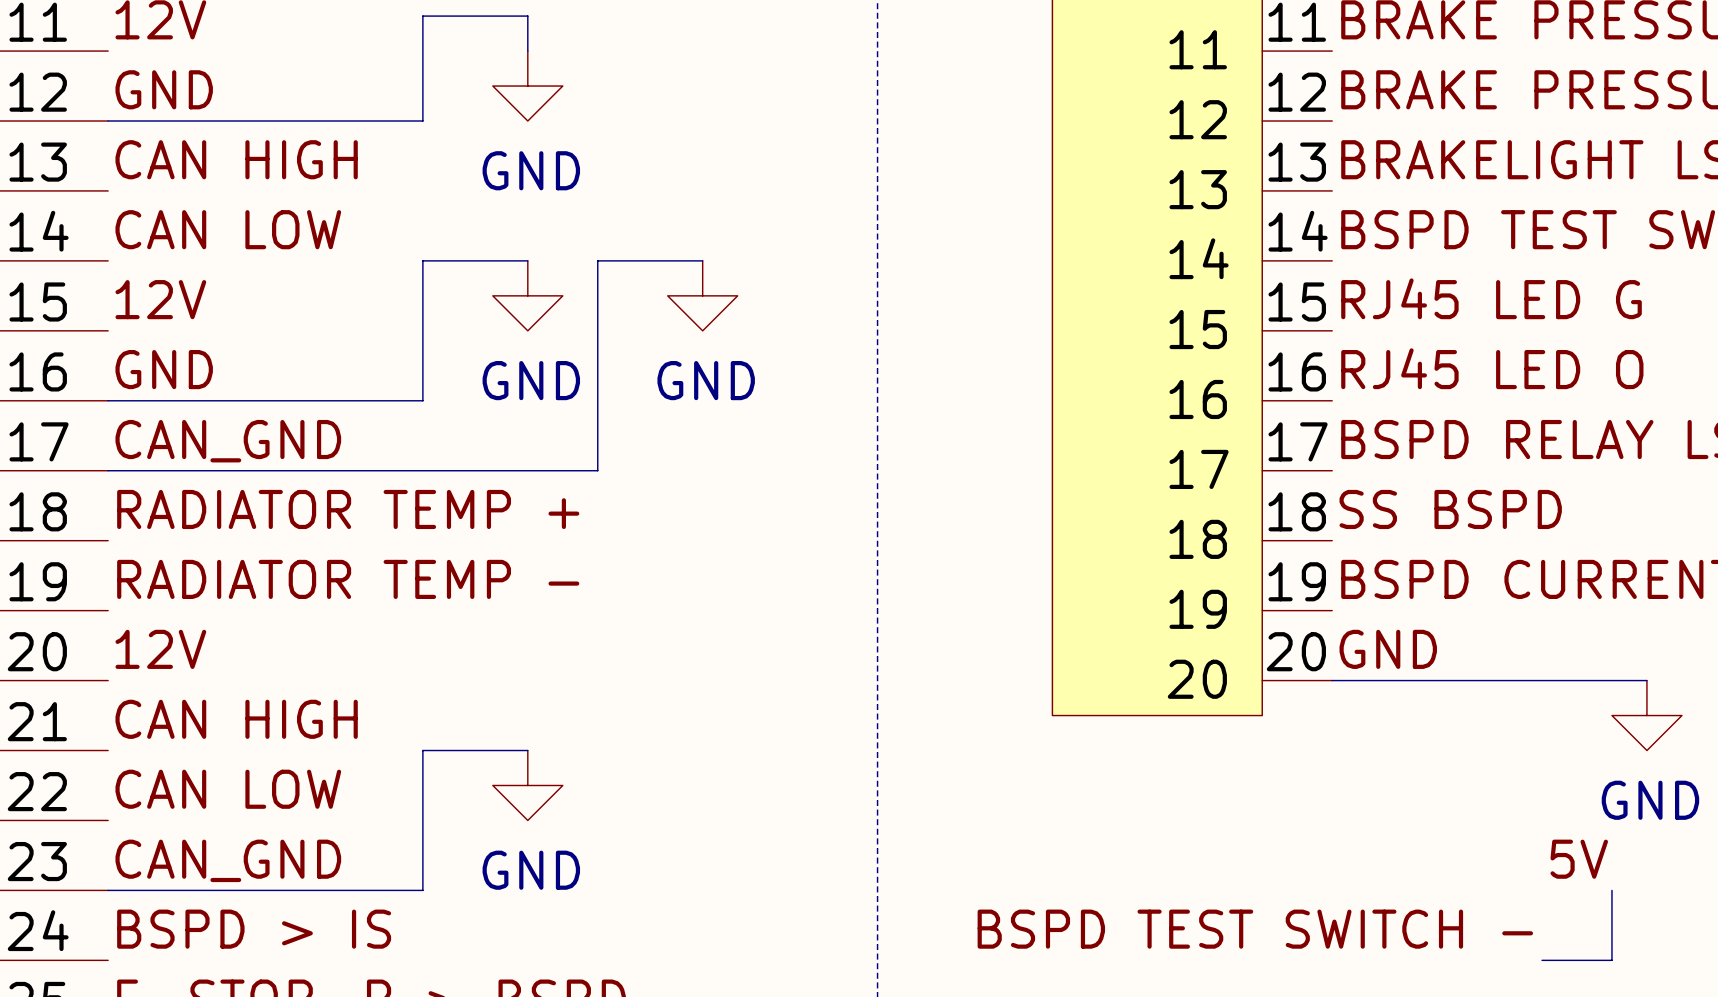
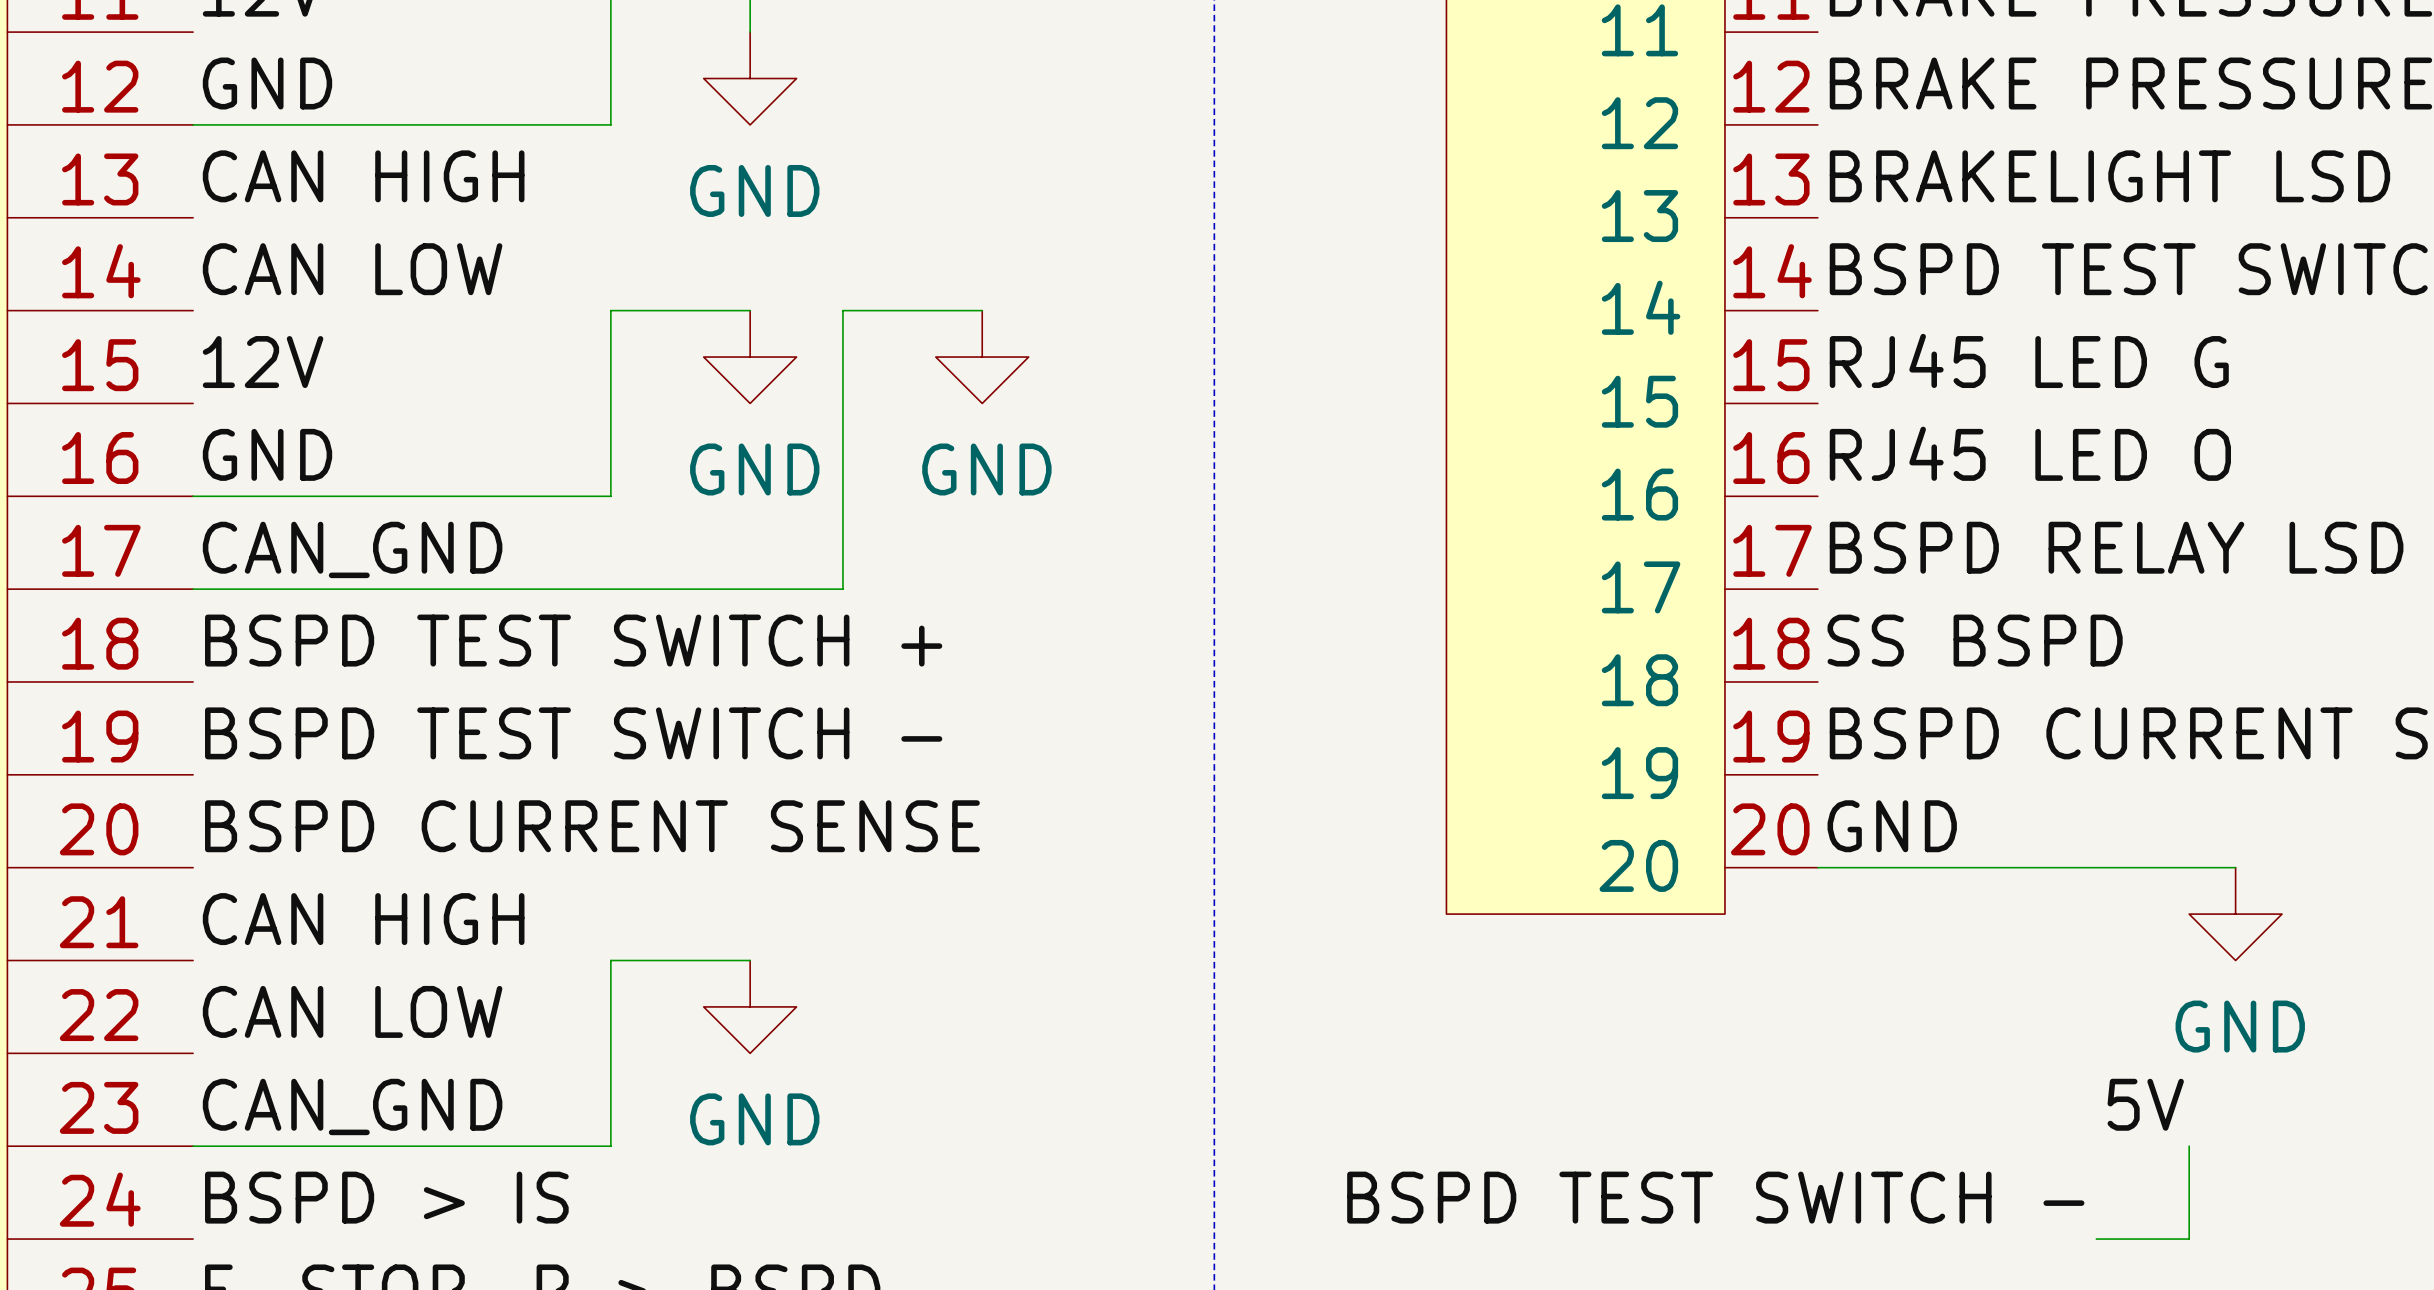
label: RADIATOR TEMP + (348, 509) -> BSPD TEST SWITCH + (573, 640)
label: RADIATOR TEMP - (348, 579) -> BSPD TEST SWITCH - (573, 733)
label: 12V (160, 649) -> BSPD CURRENT SENSE (592, 826)

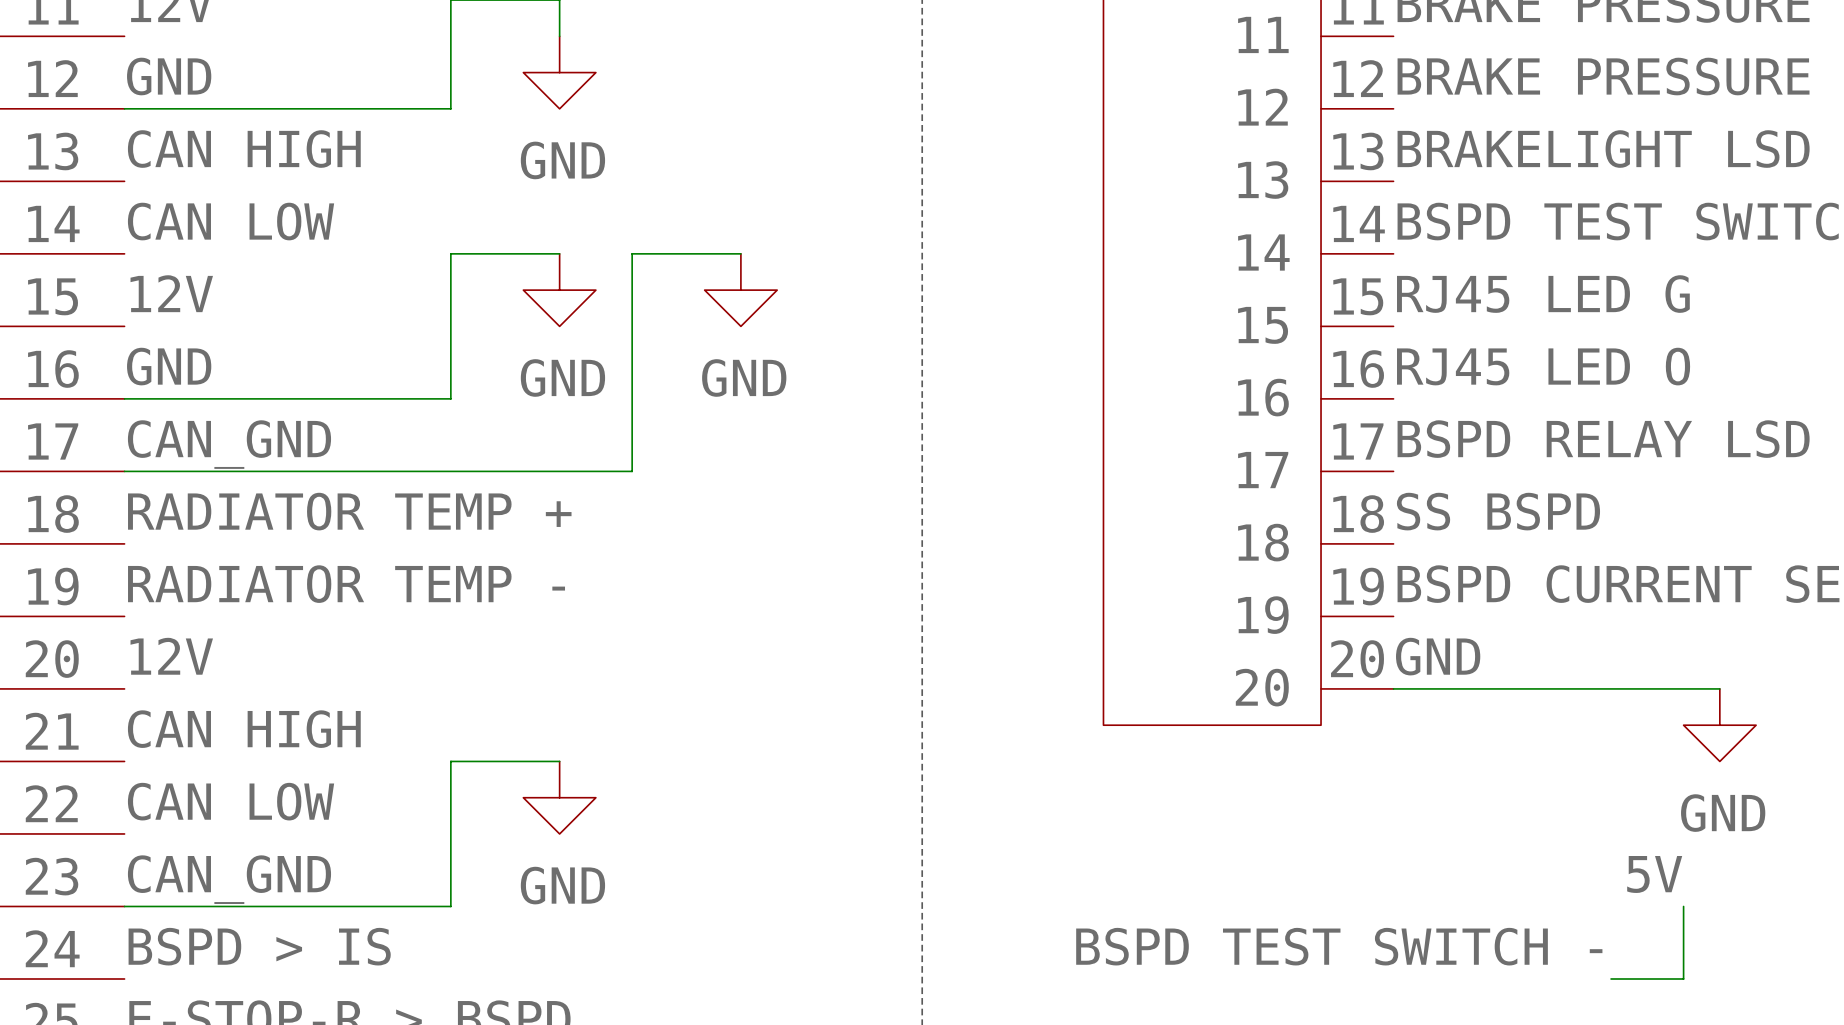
label: BSPD TEST SWITCH + (573, 640) -> RADIATOR TEMP + (349, 511)
label: BSPD TEST SWITCH - (573, 733) -> RADIATOR TEMP - (346, 584)
label: BSPD CURRENT SENSE (592, 826) -> 12V (171, 656)

